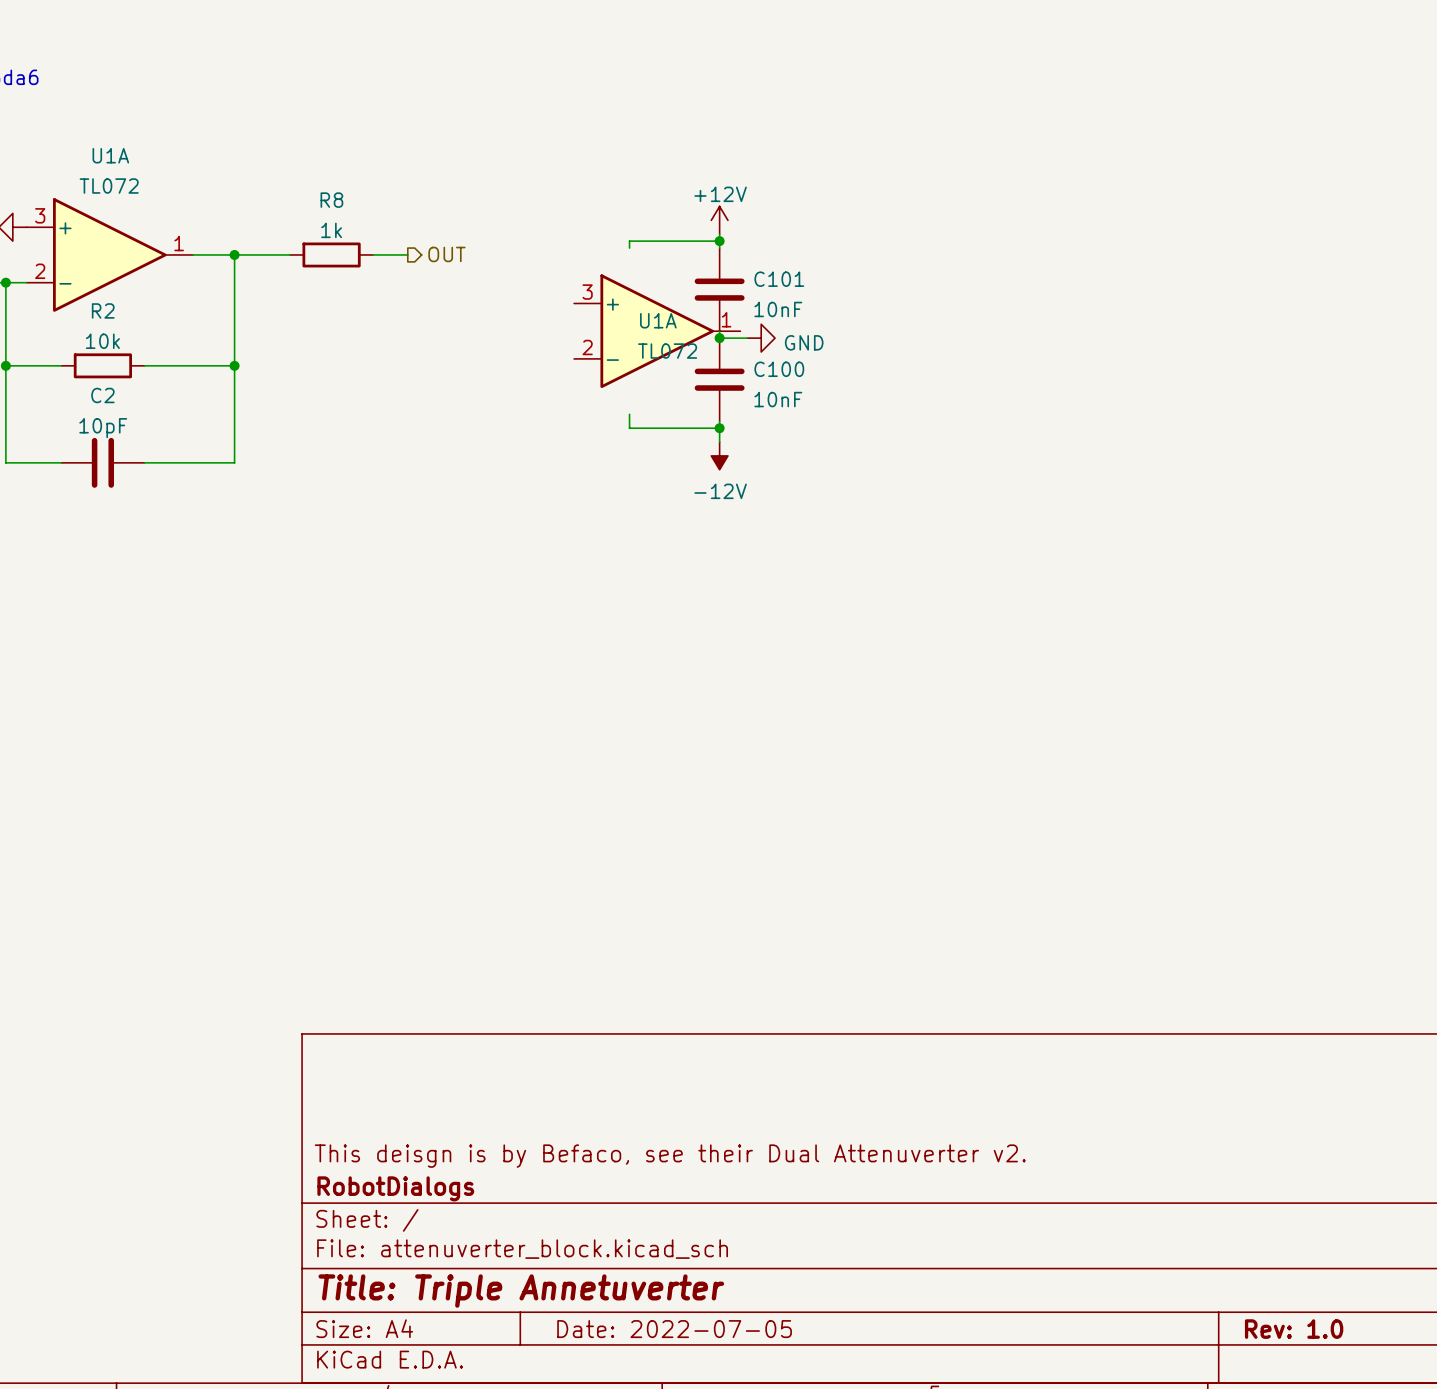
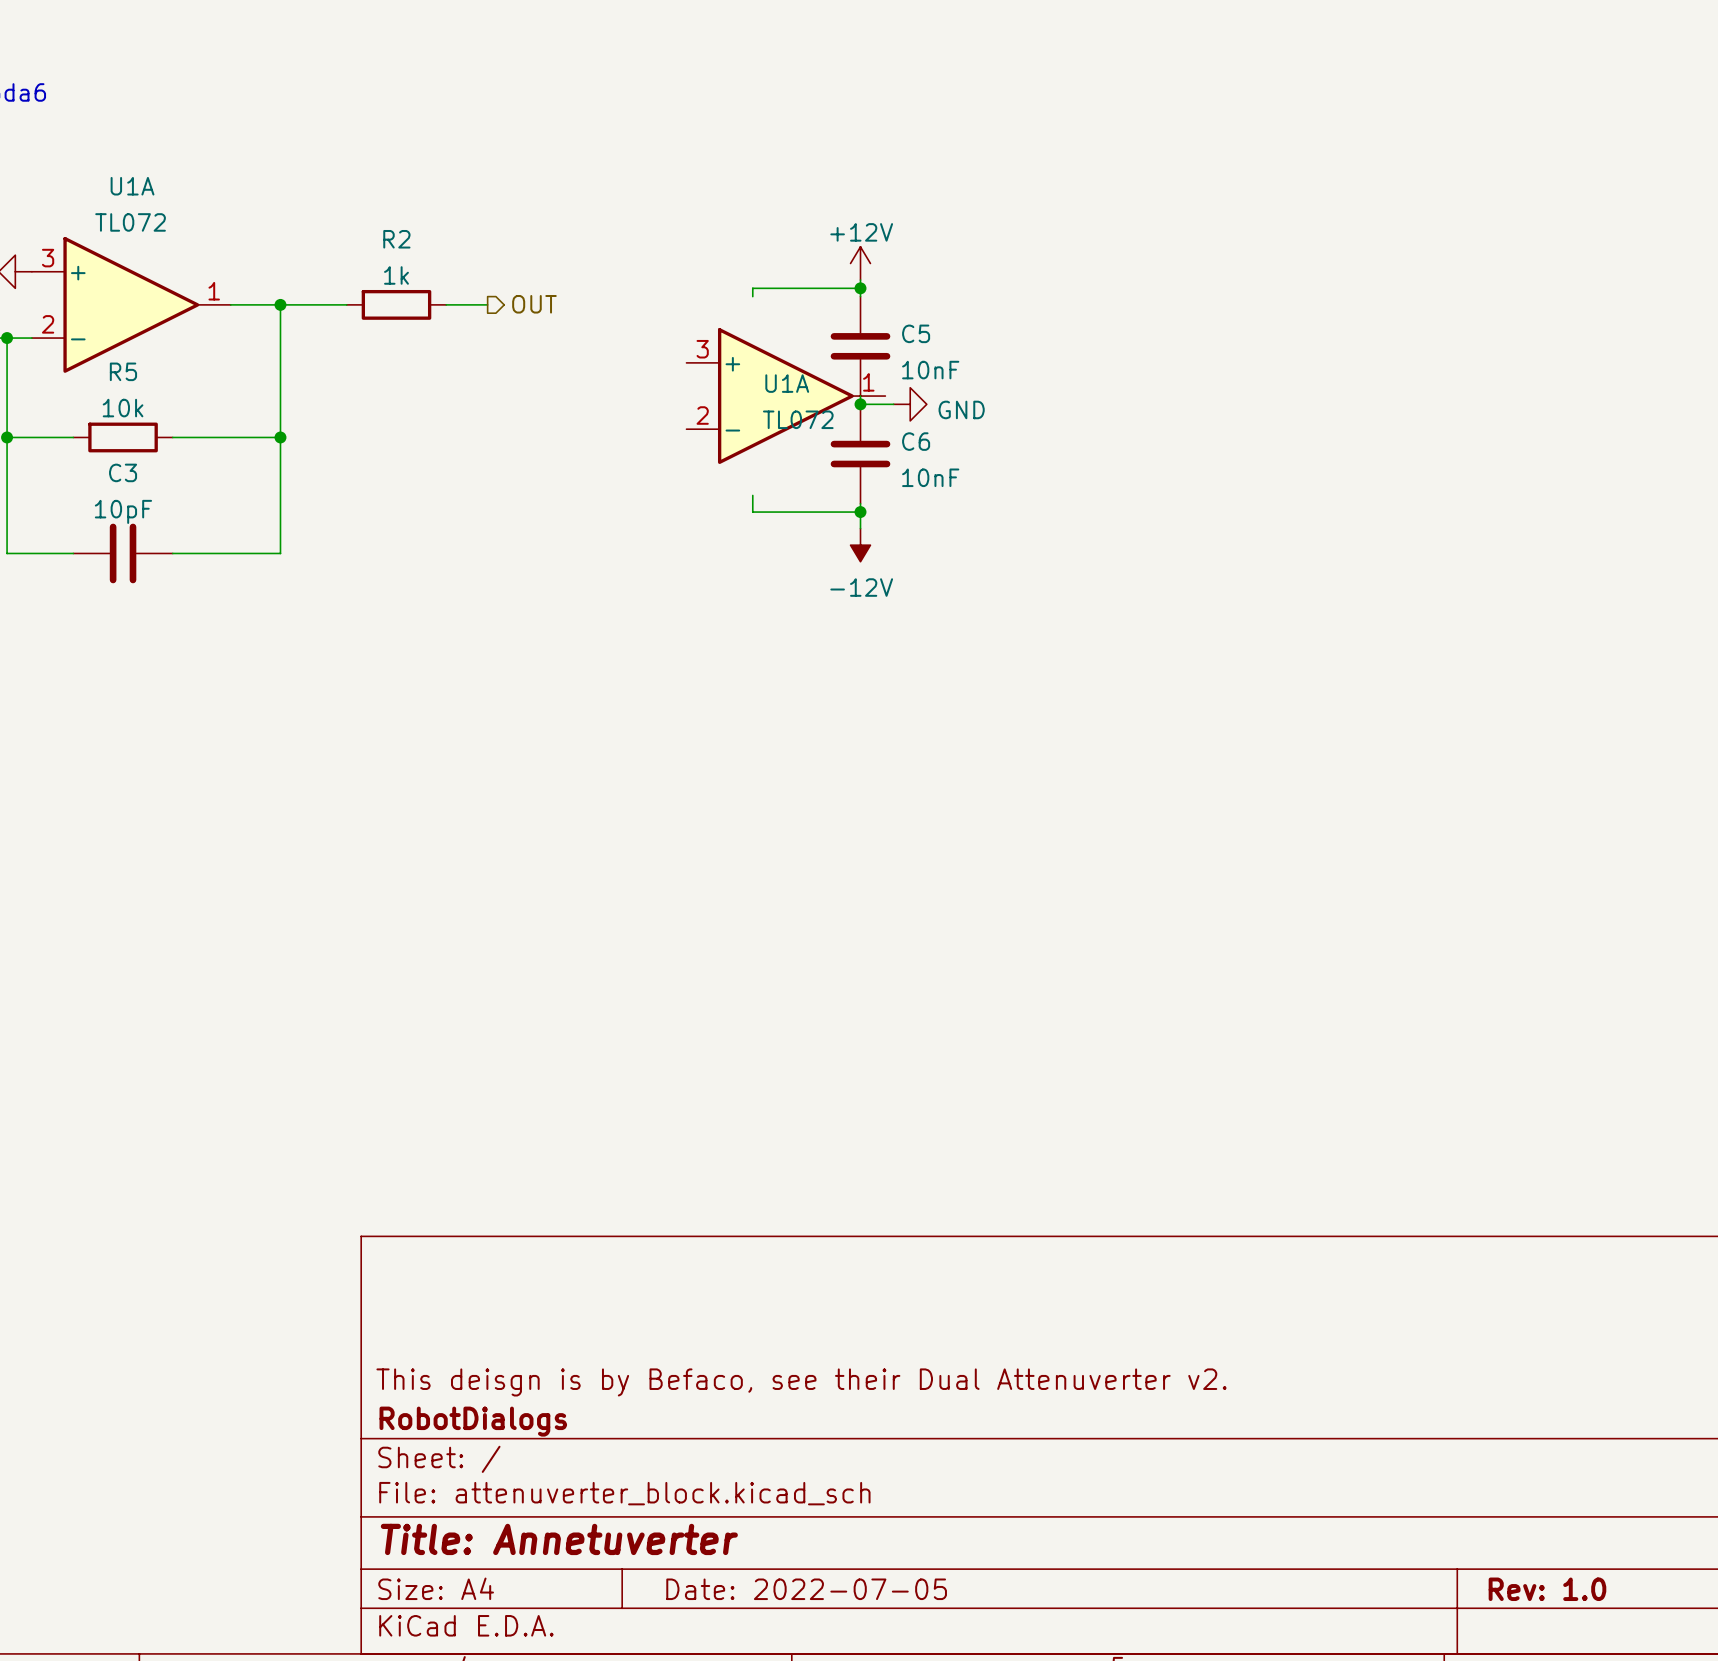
R8 name: R8 (331, 200) -> R2 (396, 239)
C101 name: C101 (779, 279) -> C5 (916, 333)
R2 name: R2 (103, 310) -> R5 (123, 371)
C100 name: C100 (779, 369) -> C6 (916, 441)
C2 name: C2 (102, 395) -> C3 (123, 472)
title block: Title: Triple Annetuverter (521, 1291) -> Title: Annetuverter (559, 1539)

